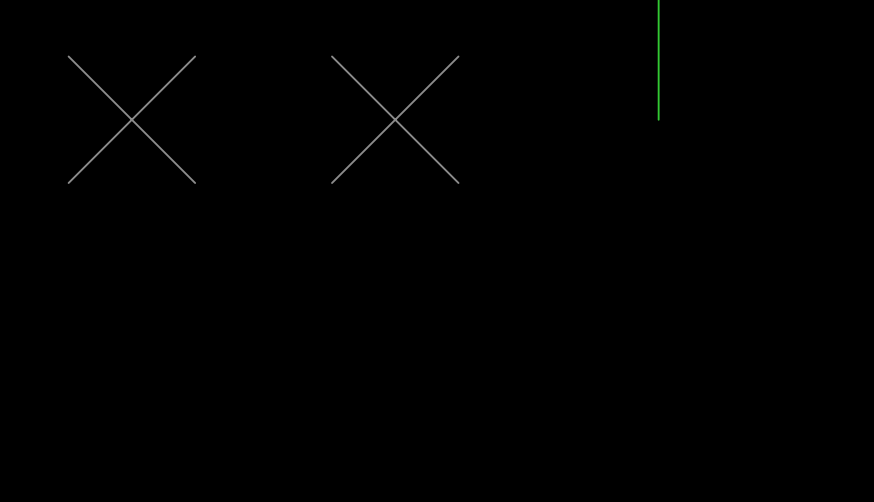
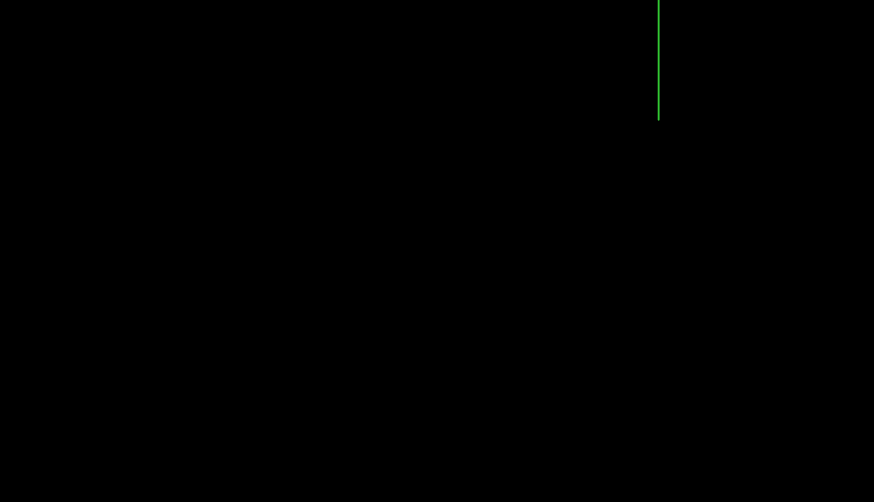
no-connect mark: (131, 119) -> none
no-connect mark: (395, 119) -> none

